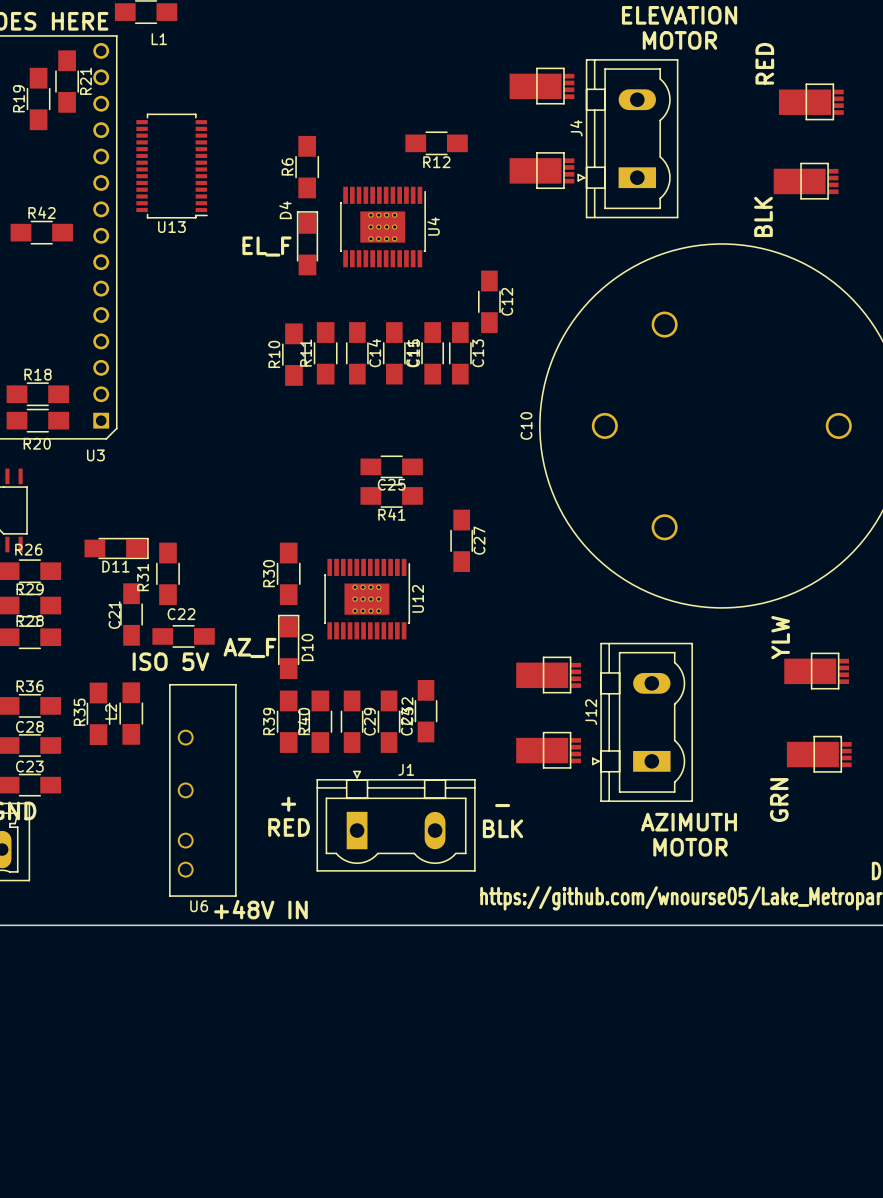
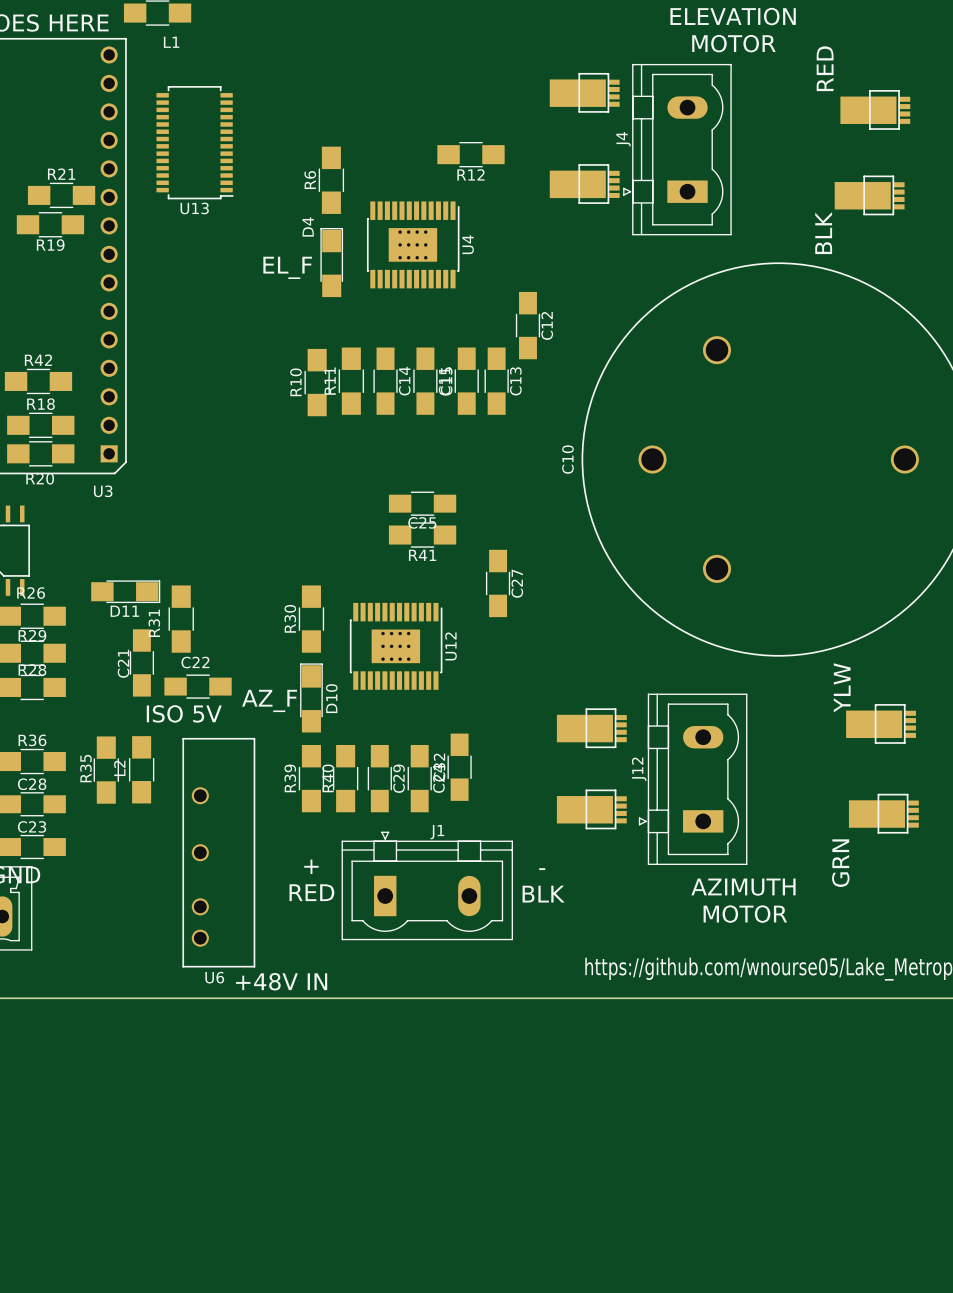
R21 rotation: 0° (67, 81) -> 90° clockwise (61, 195)
R21 position: (67, 81) -> (61, 195)
R21 name position: R21 (85, 81) -> R21 (61, 174)
R19 name position: R19 (18, 98) -> R19 (50, 245)
R19 rotation: 0° (38, 98) -> 90° clockwise (50, 224)
R19 position: (38, 98) -> (50, 224)
U13 position: (172, 166) -> (195, 142)
R42 position: (41, 232) -> (38, 381)

